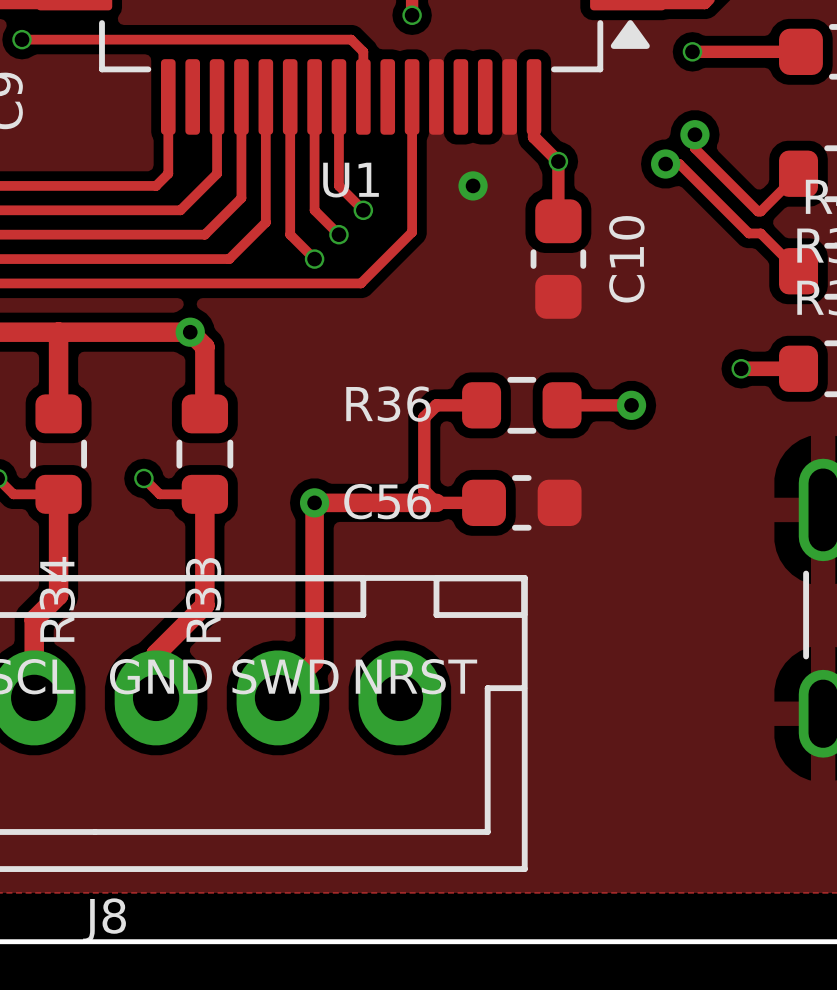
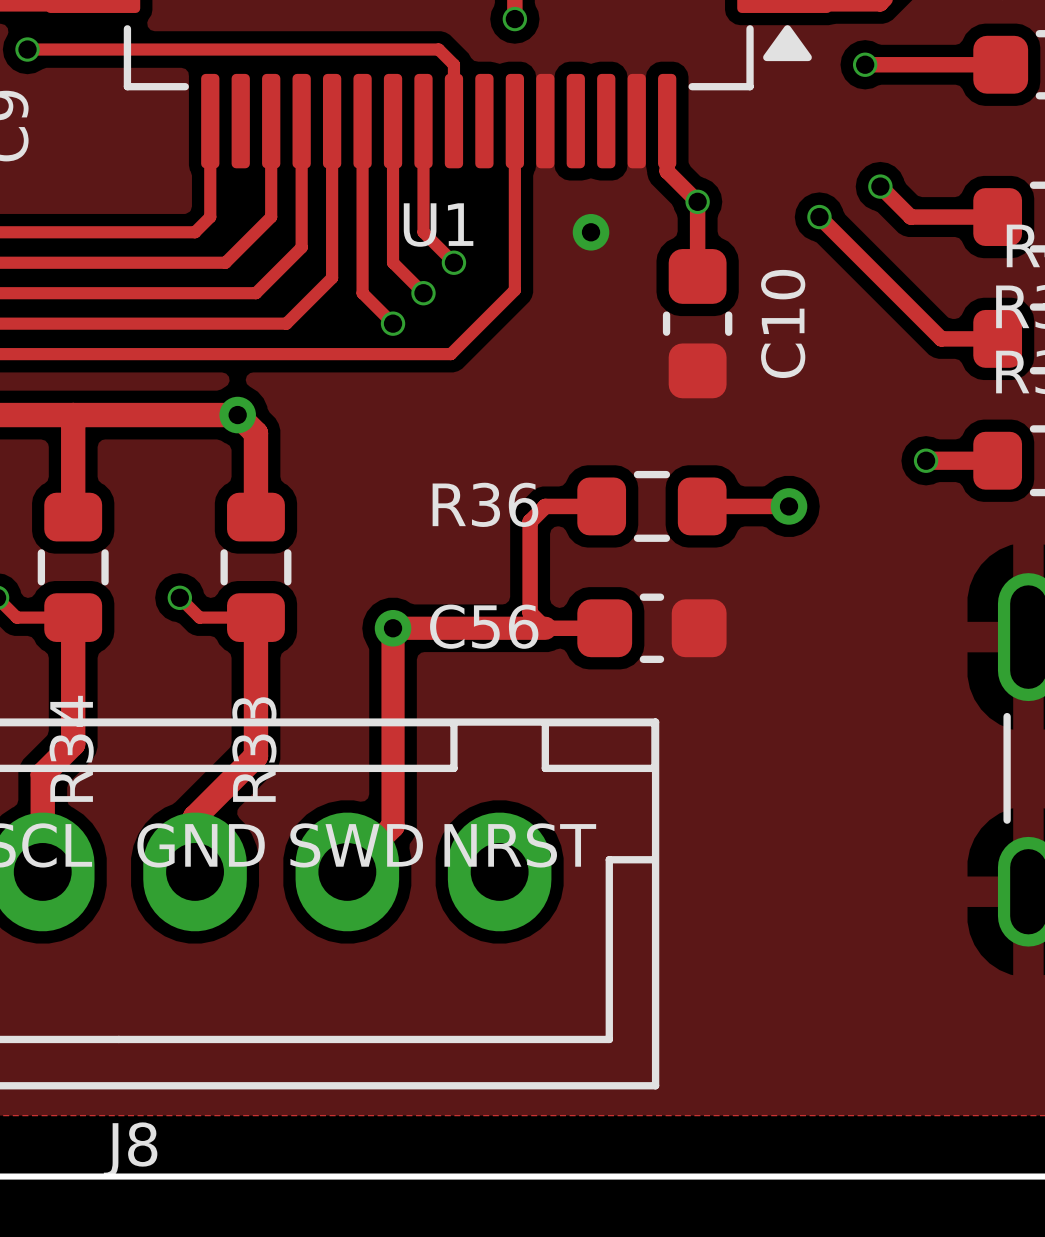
via size: [680, 120, 710, 150] -> [868, 174, 893, 199]
track: (694, 134) (694, 148) (757, 211) (760, 211) (798, 173) -> (880, 186) (910, 217) (997, 217)
via size: [651, 149, 681, 179] -> [807, 204, 832, 230]
track: (665, 164) (679, 164) (748, 233) (760, 233) (798, 271) -> (819, 217) (941, 338) (997, 338)

